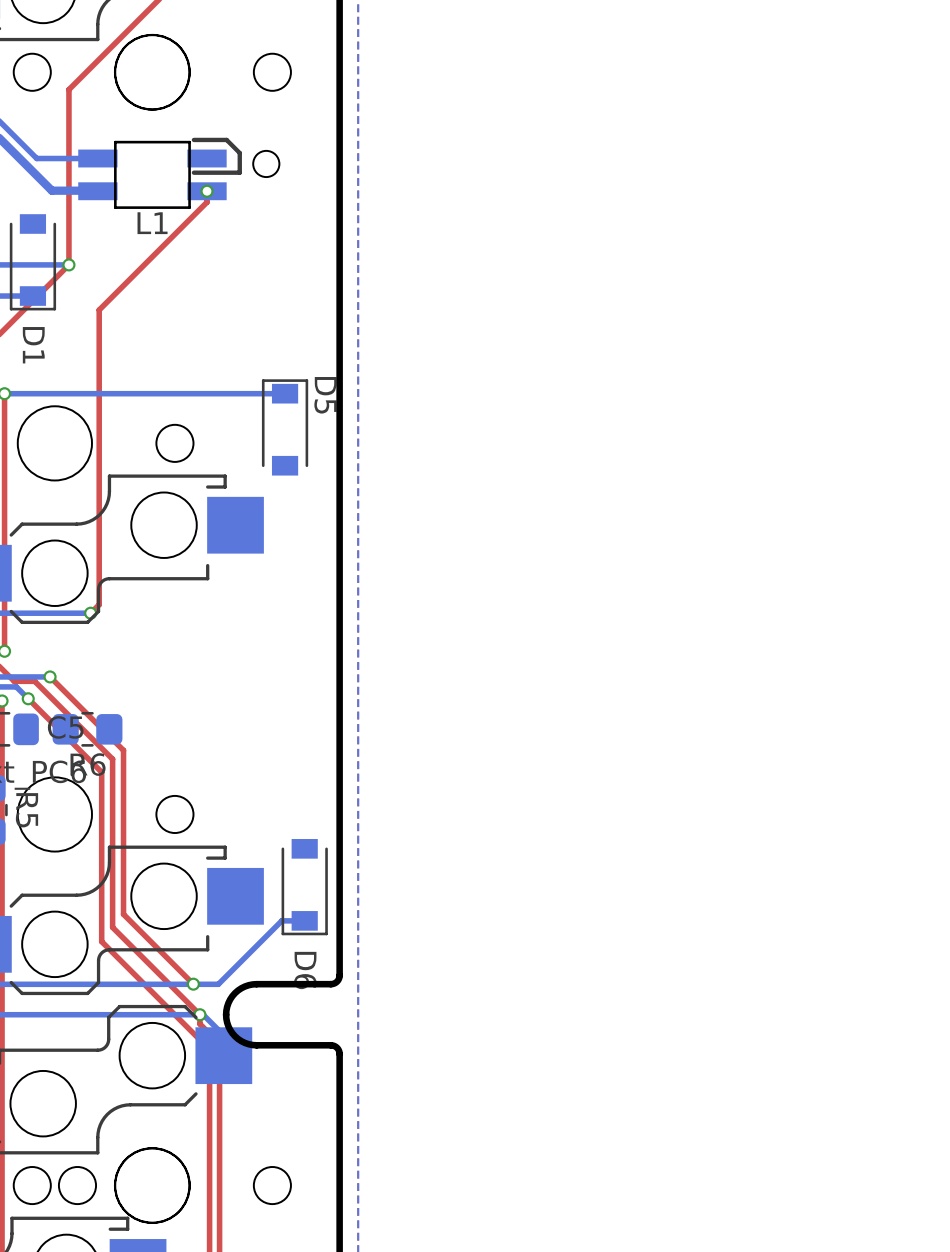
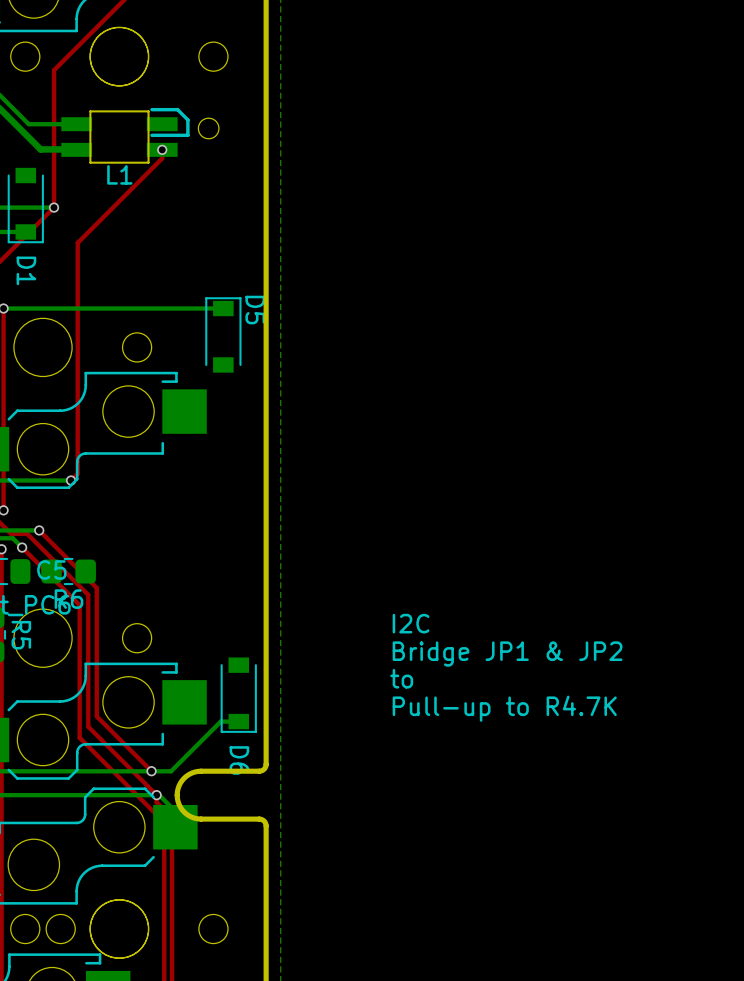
text: none -> I2C (411, 623)
text: none -> Bridge JP1 & JP2 (507, 654)
text: none -> to (401, 678)
text: none -> Pull-up to R4.7K (504, 708)

